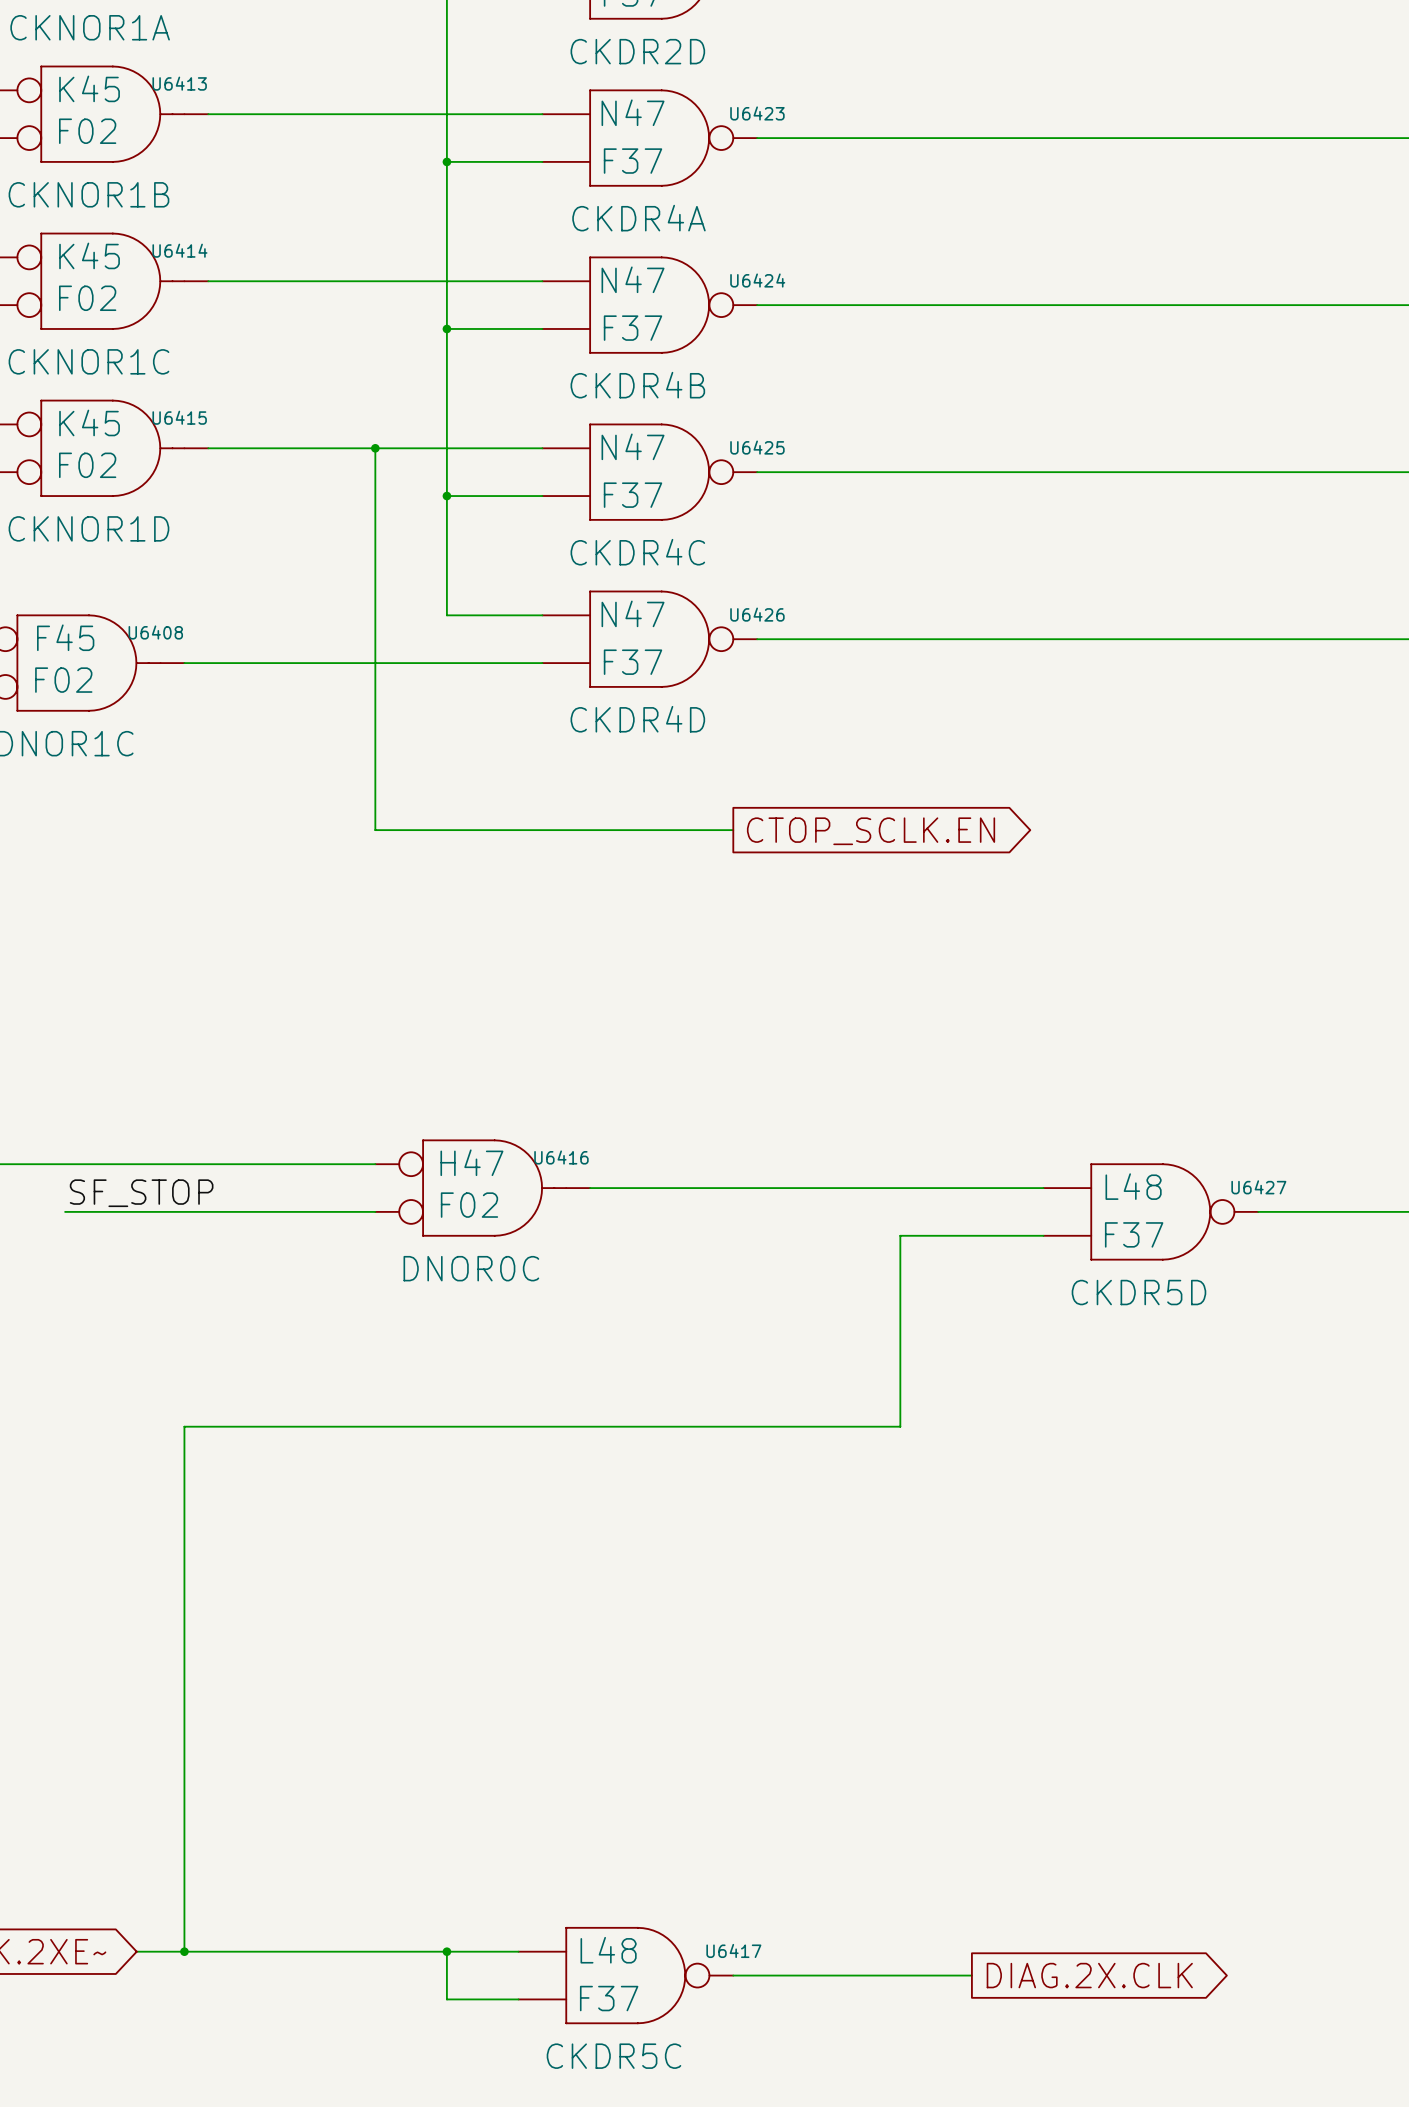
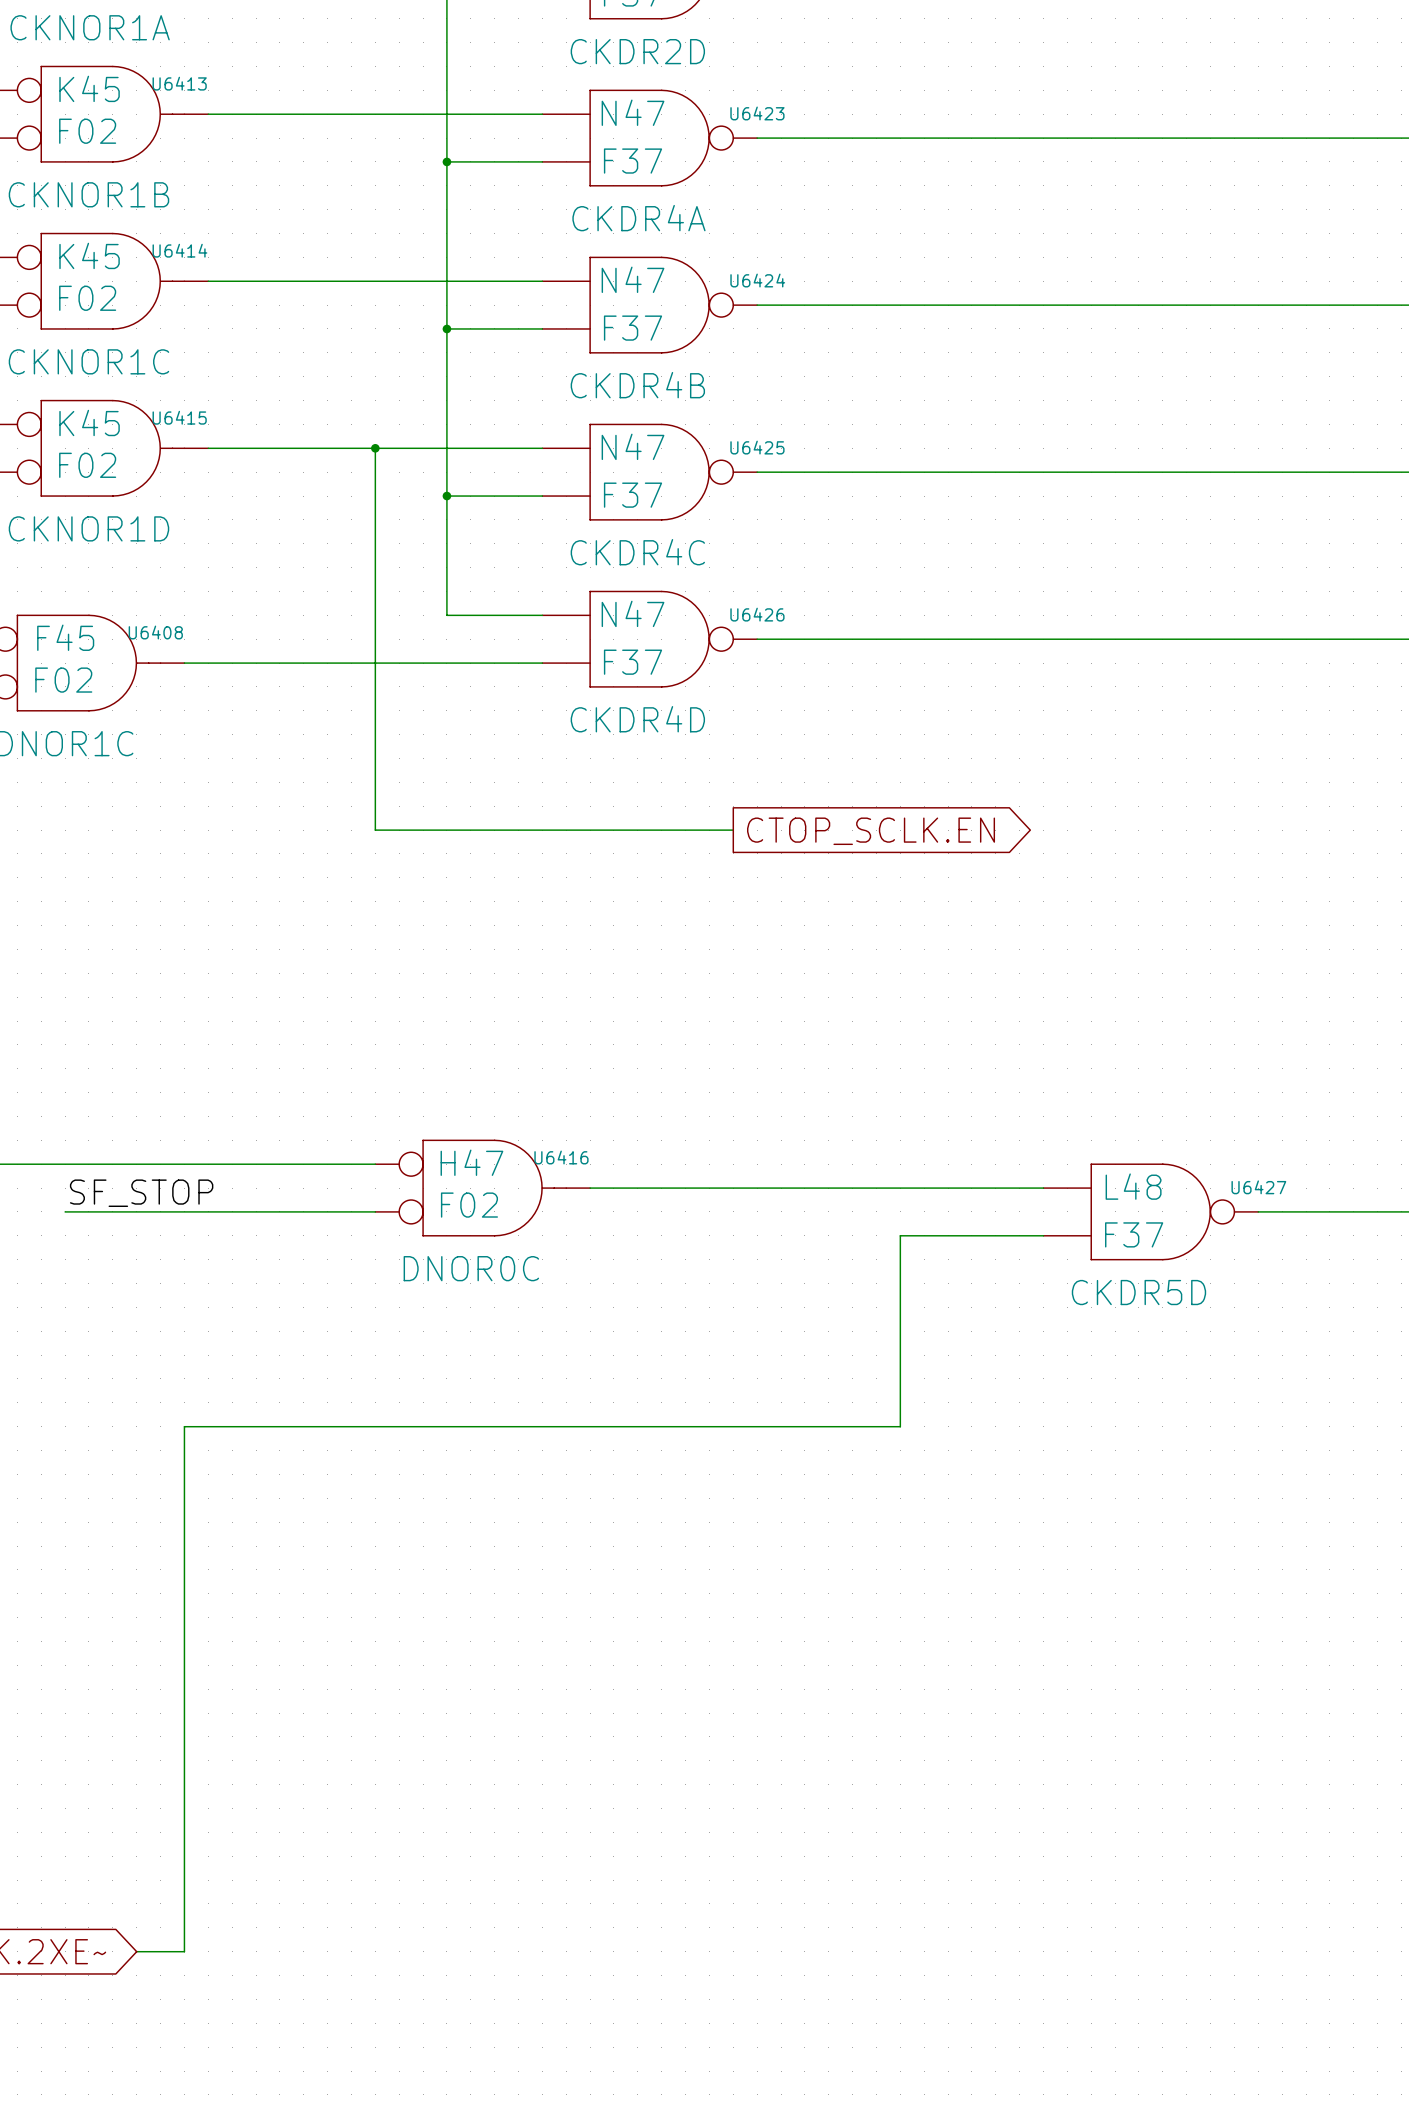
wire: (184, 1951) (518, 1951) -> none
junction: (184, 1951) -> none
wire: (446, 1951) (446, 1999) (518, 1999) -> none
junction: (446, 1951) -> none
U6417: F37 (625, 1975) -> none
wire: (733, 1975) (971, 1975) -> none
global label: DIAG.2X.CLK (1089, 1975) -> none

